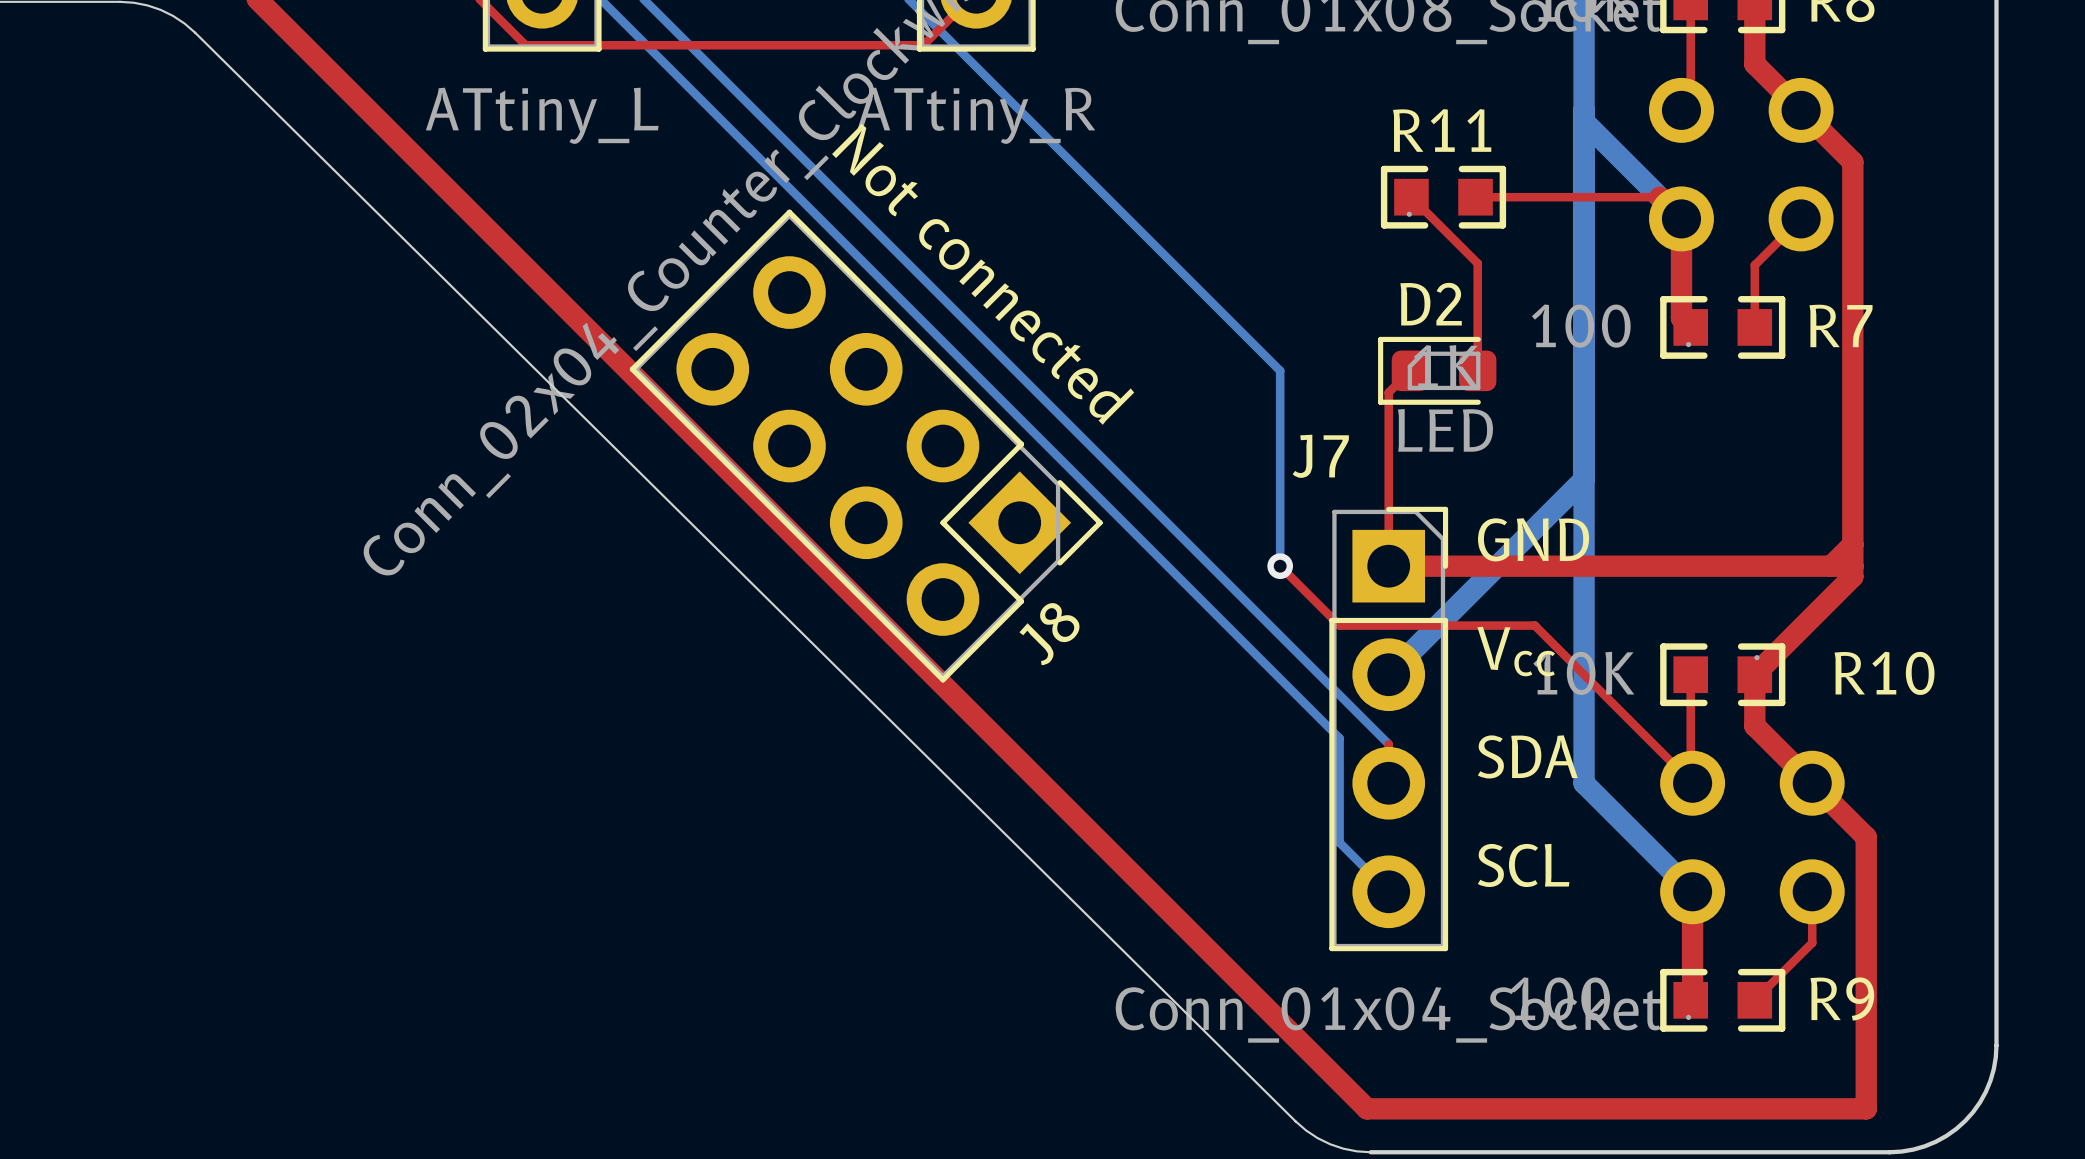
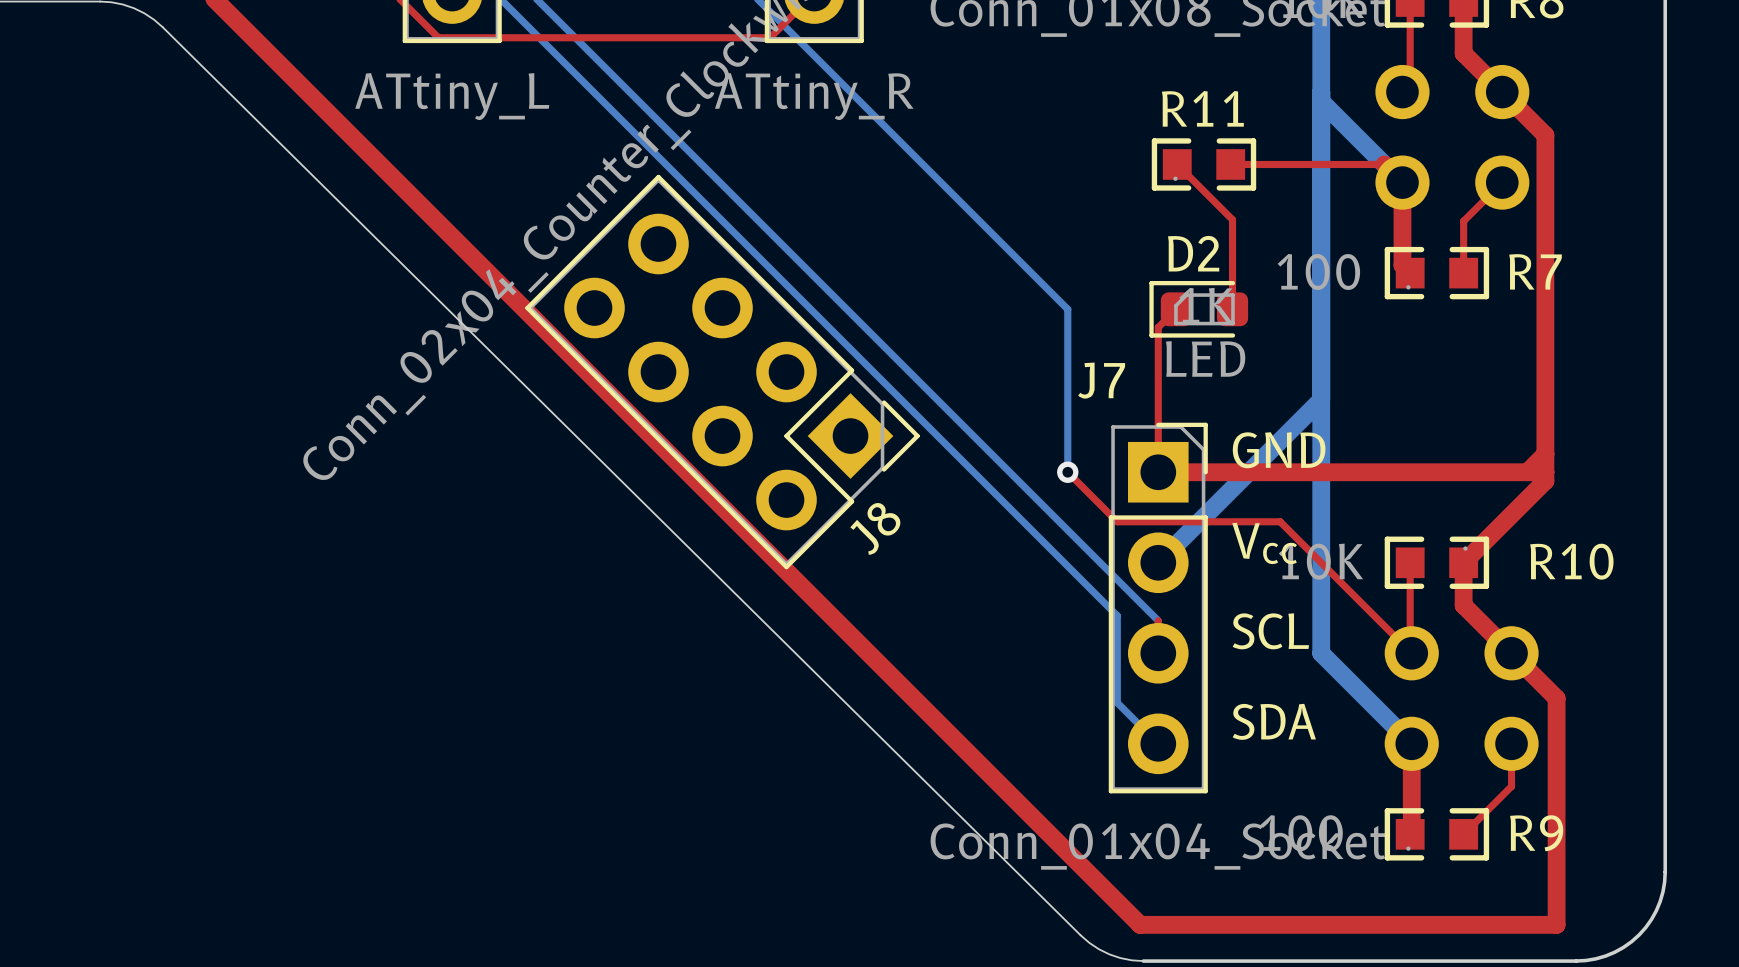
text: Not connected (983, 274) -> none
J7 text: SDA (1527, 756) -> SCL (1270, 631)
J7 text: SCL (1523, 865) -> SDA (1274, 721)

